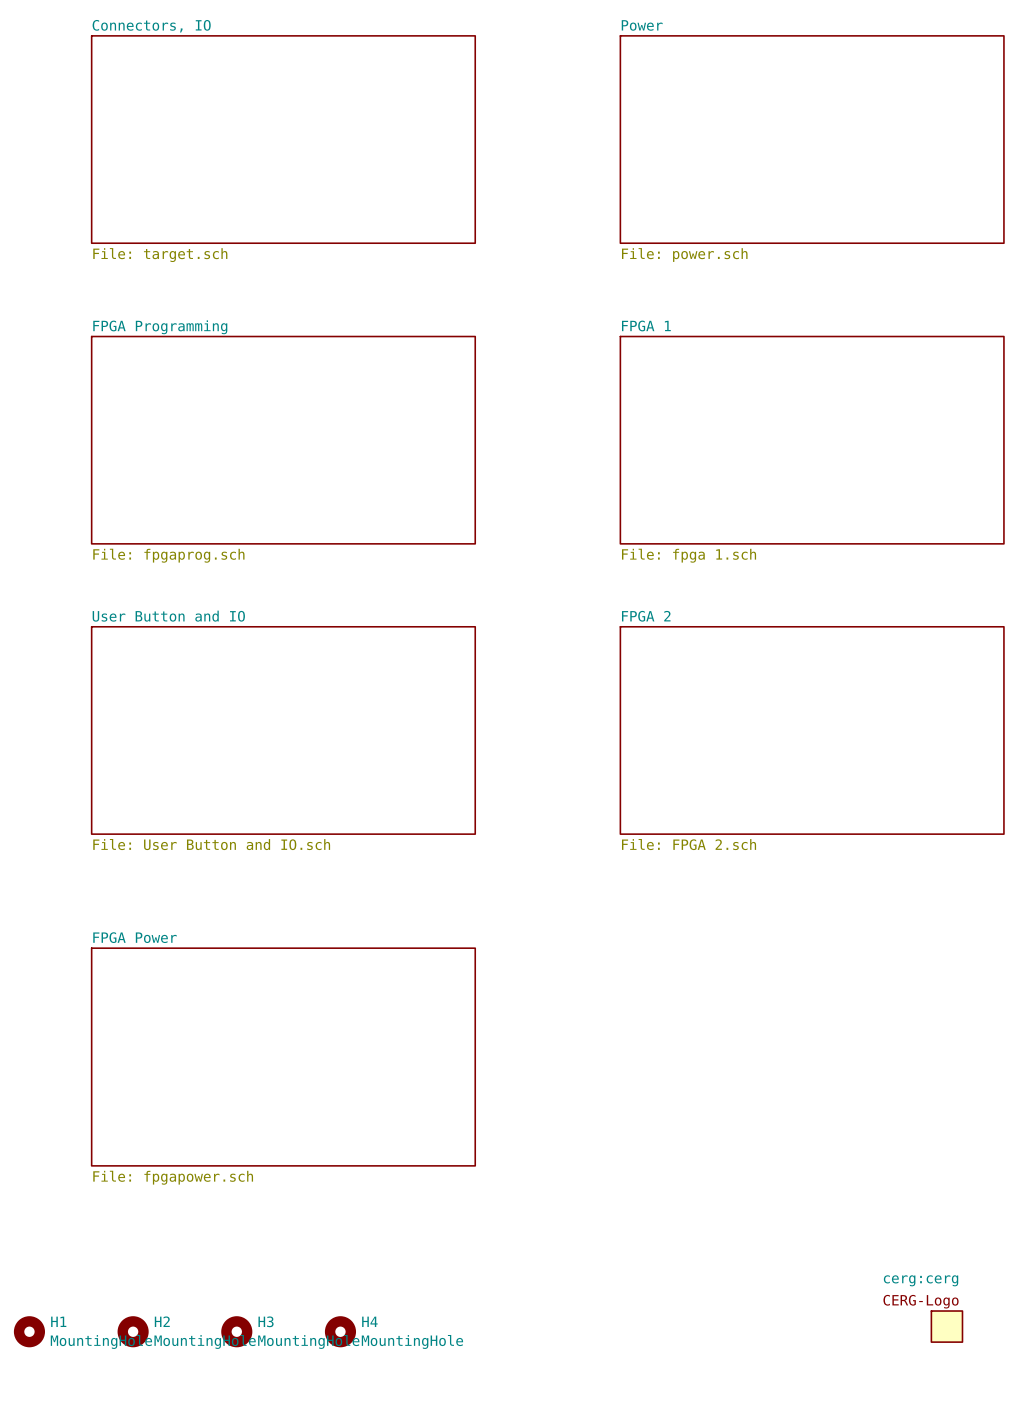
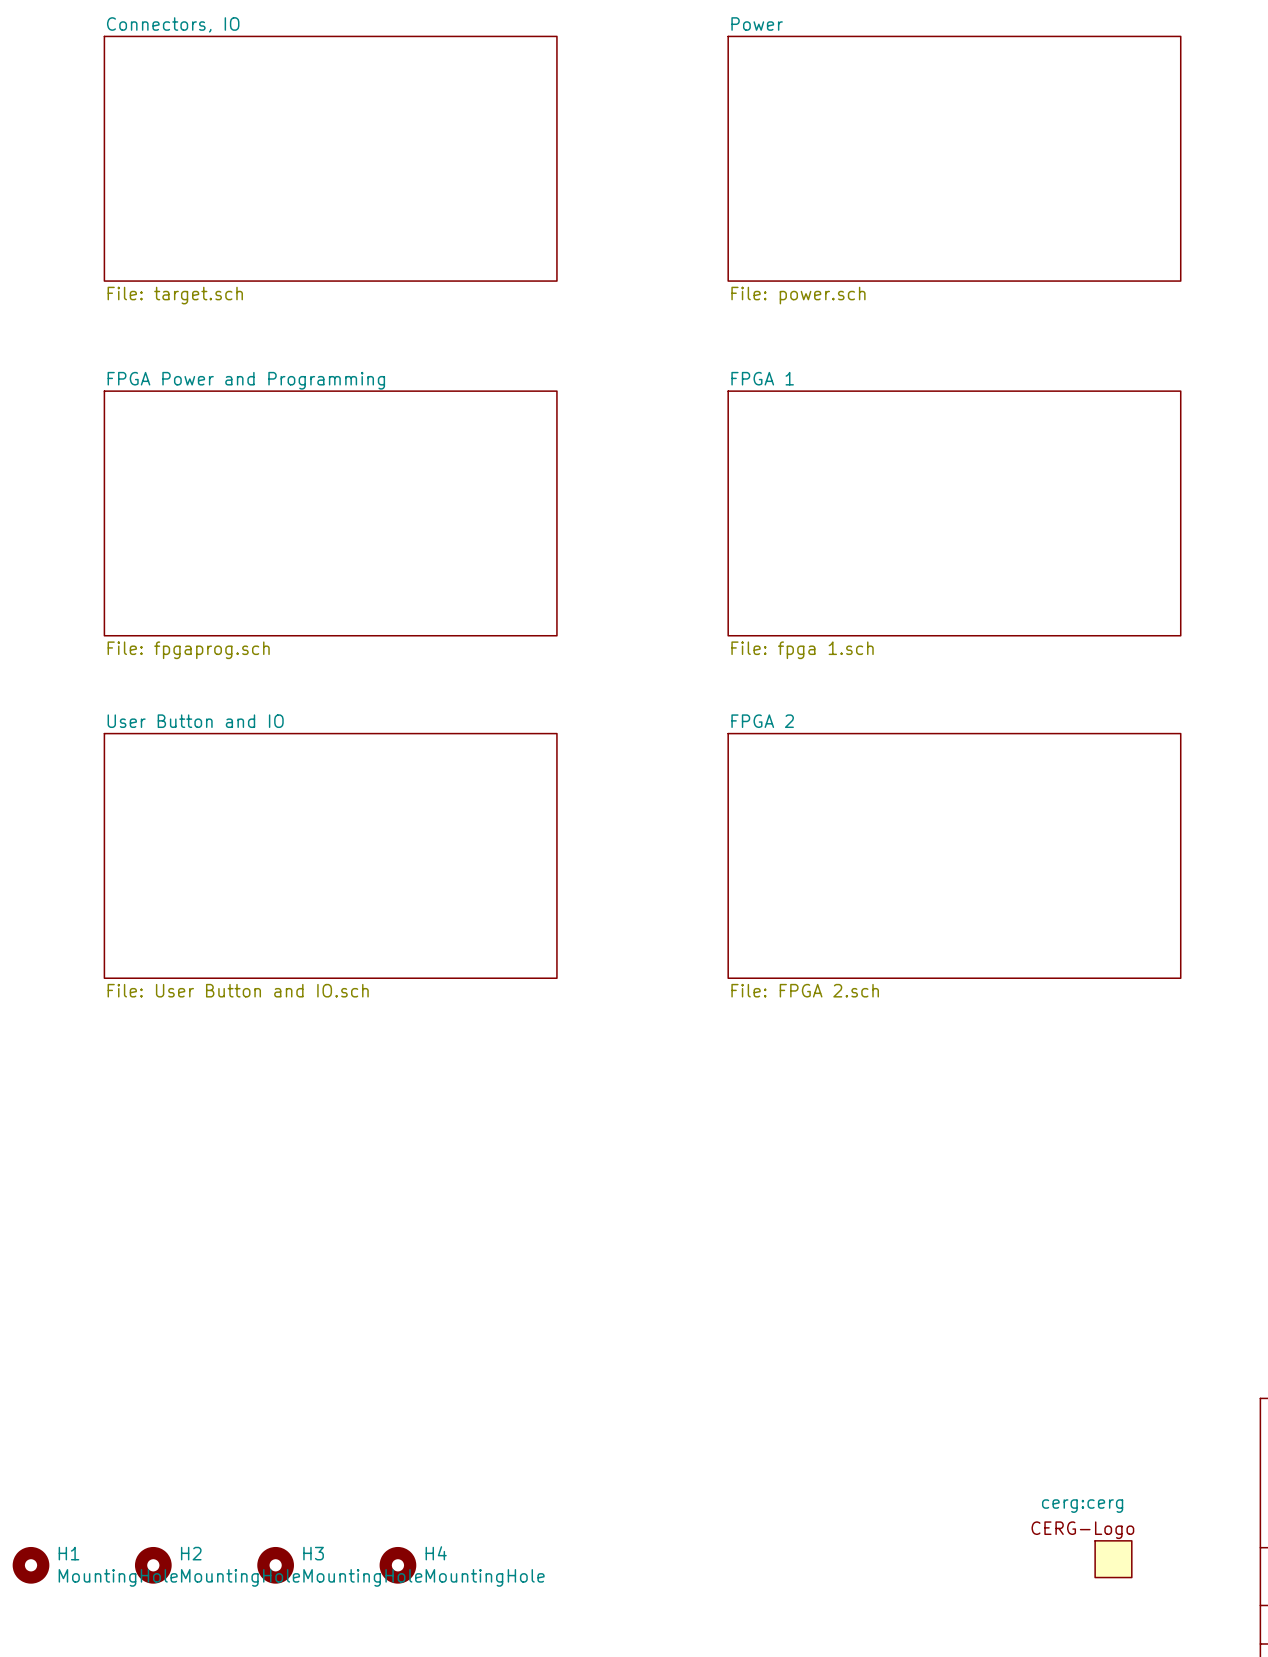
sheet FPGA Programming name: FPGA Programming (160, 327) -> FPGA Power and Programming (246, 380)
sheet FPGA Power: File: fpgapower.sch (283, 1057) -> none

